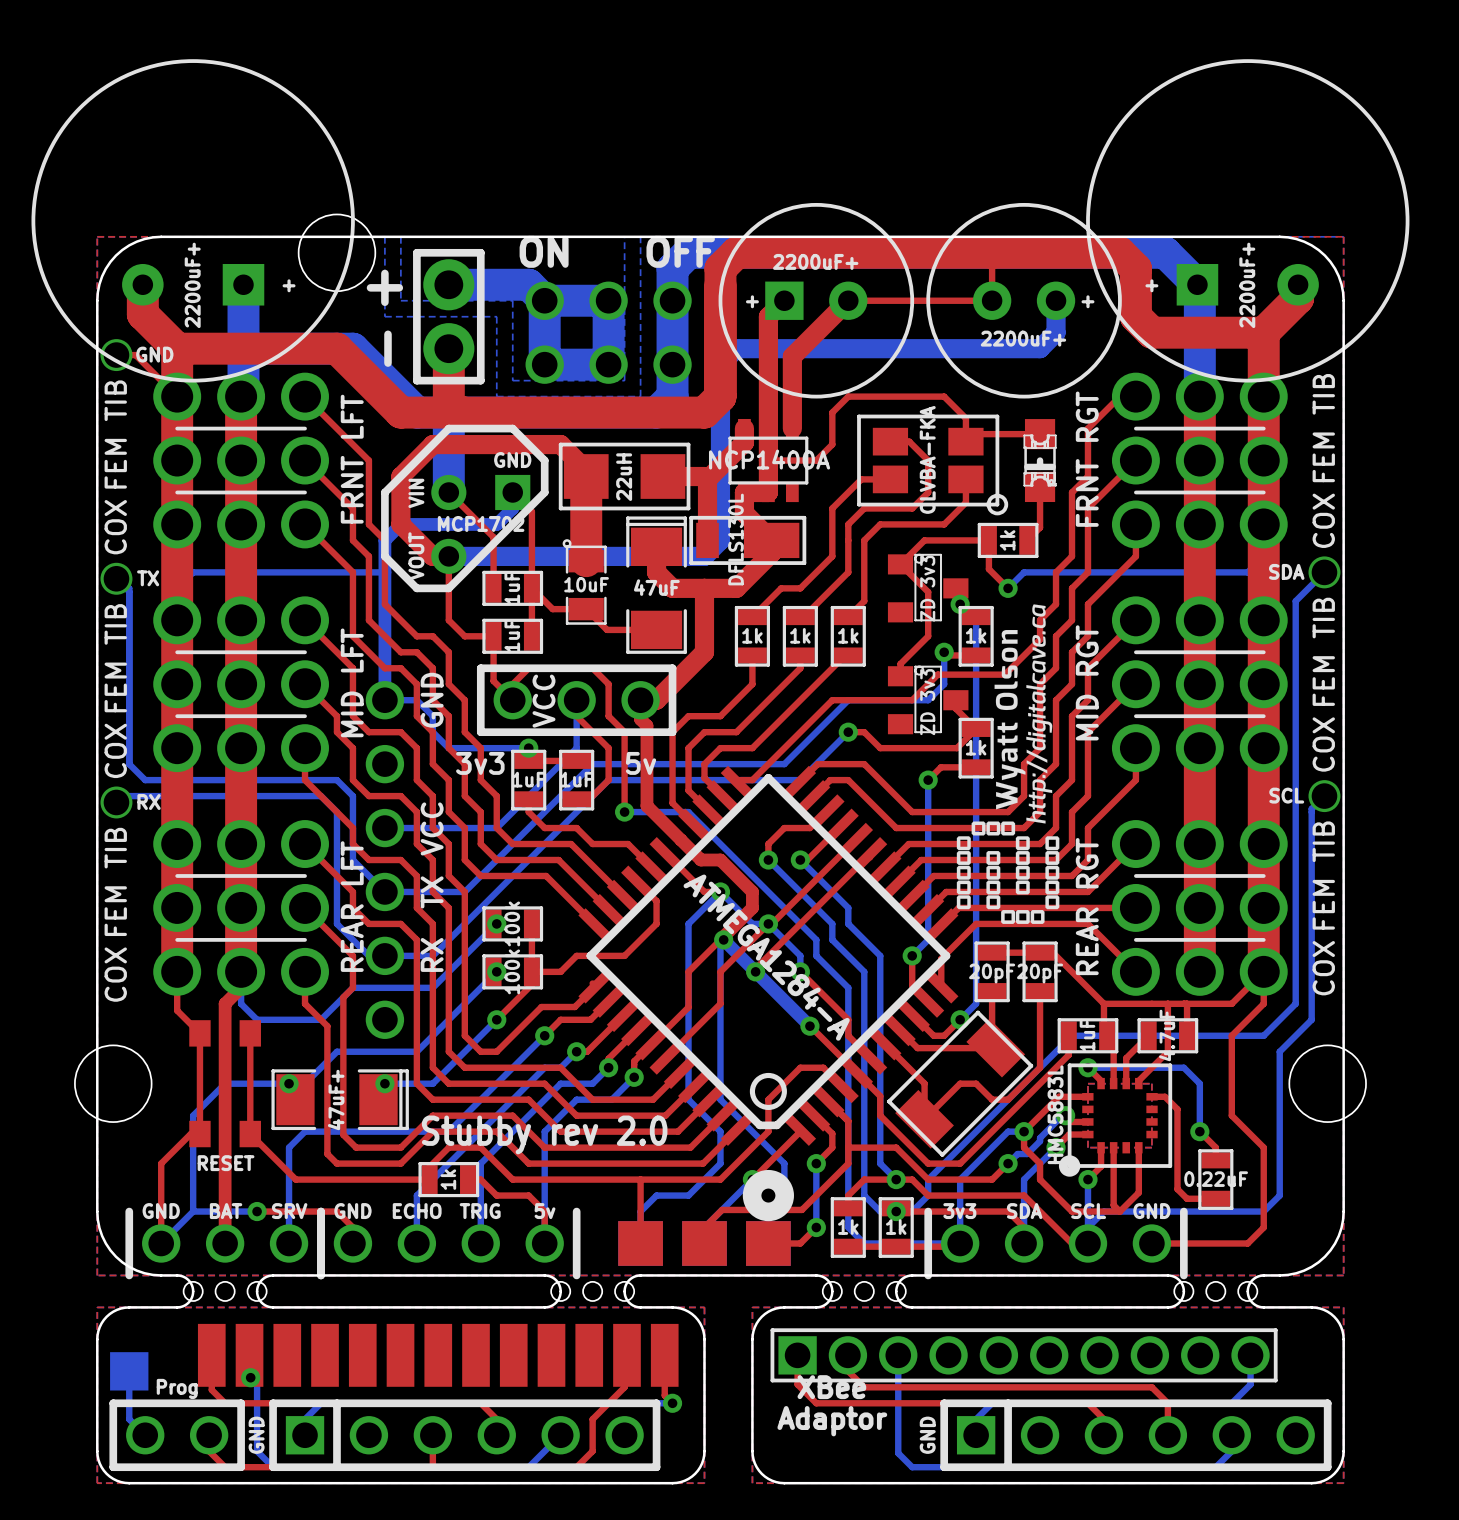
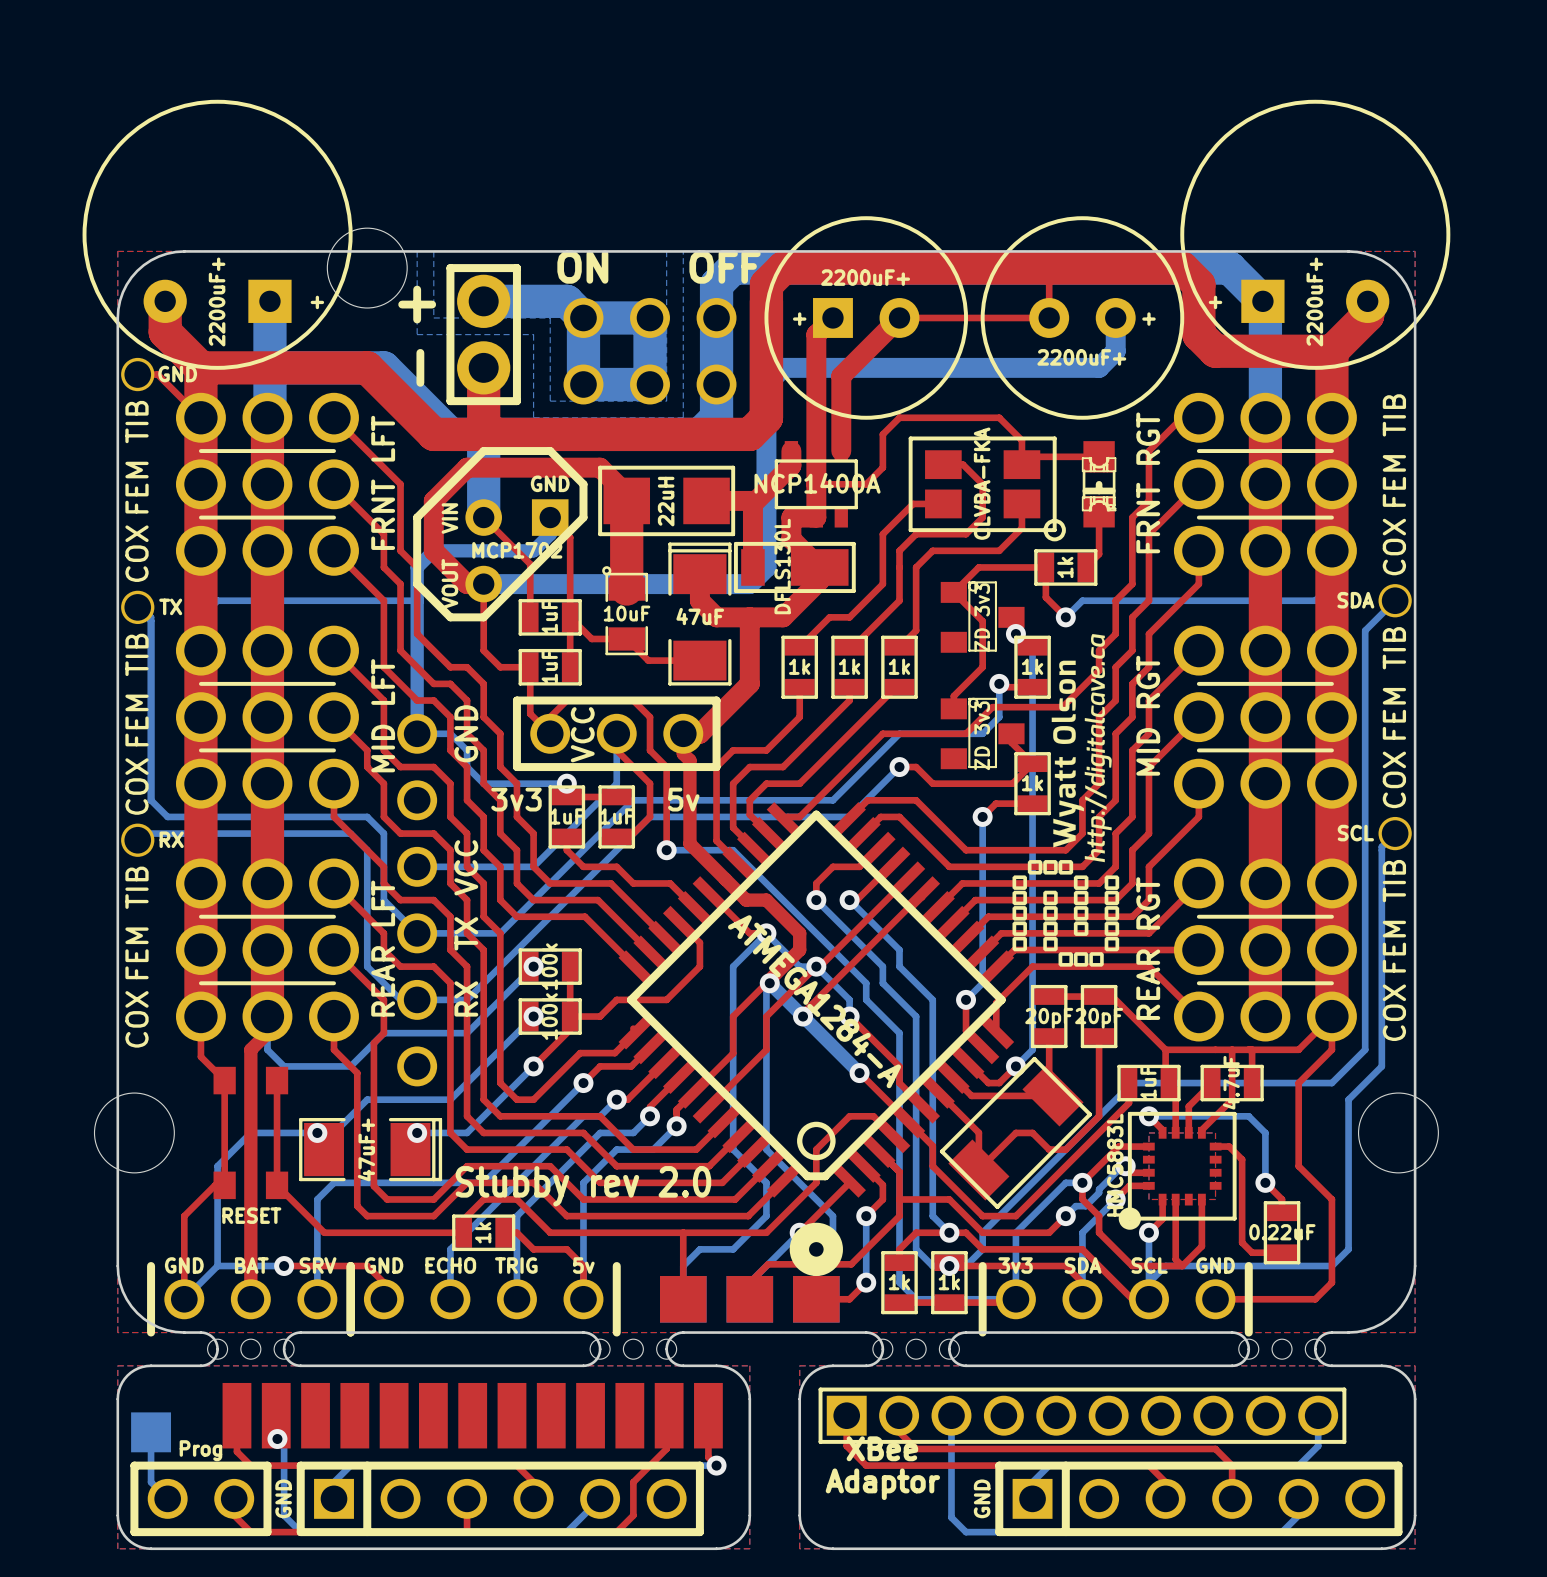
part footprint: [31, 59, 355, 383] -> [82, 99, 353, 370]
part footprint: [1086, 59, 1410, 383] -> [1180, 99, 1451, 370]

